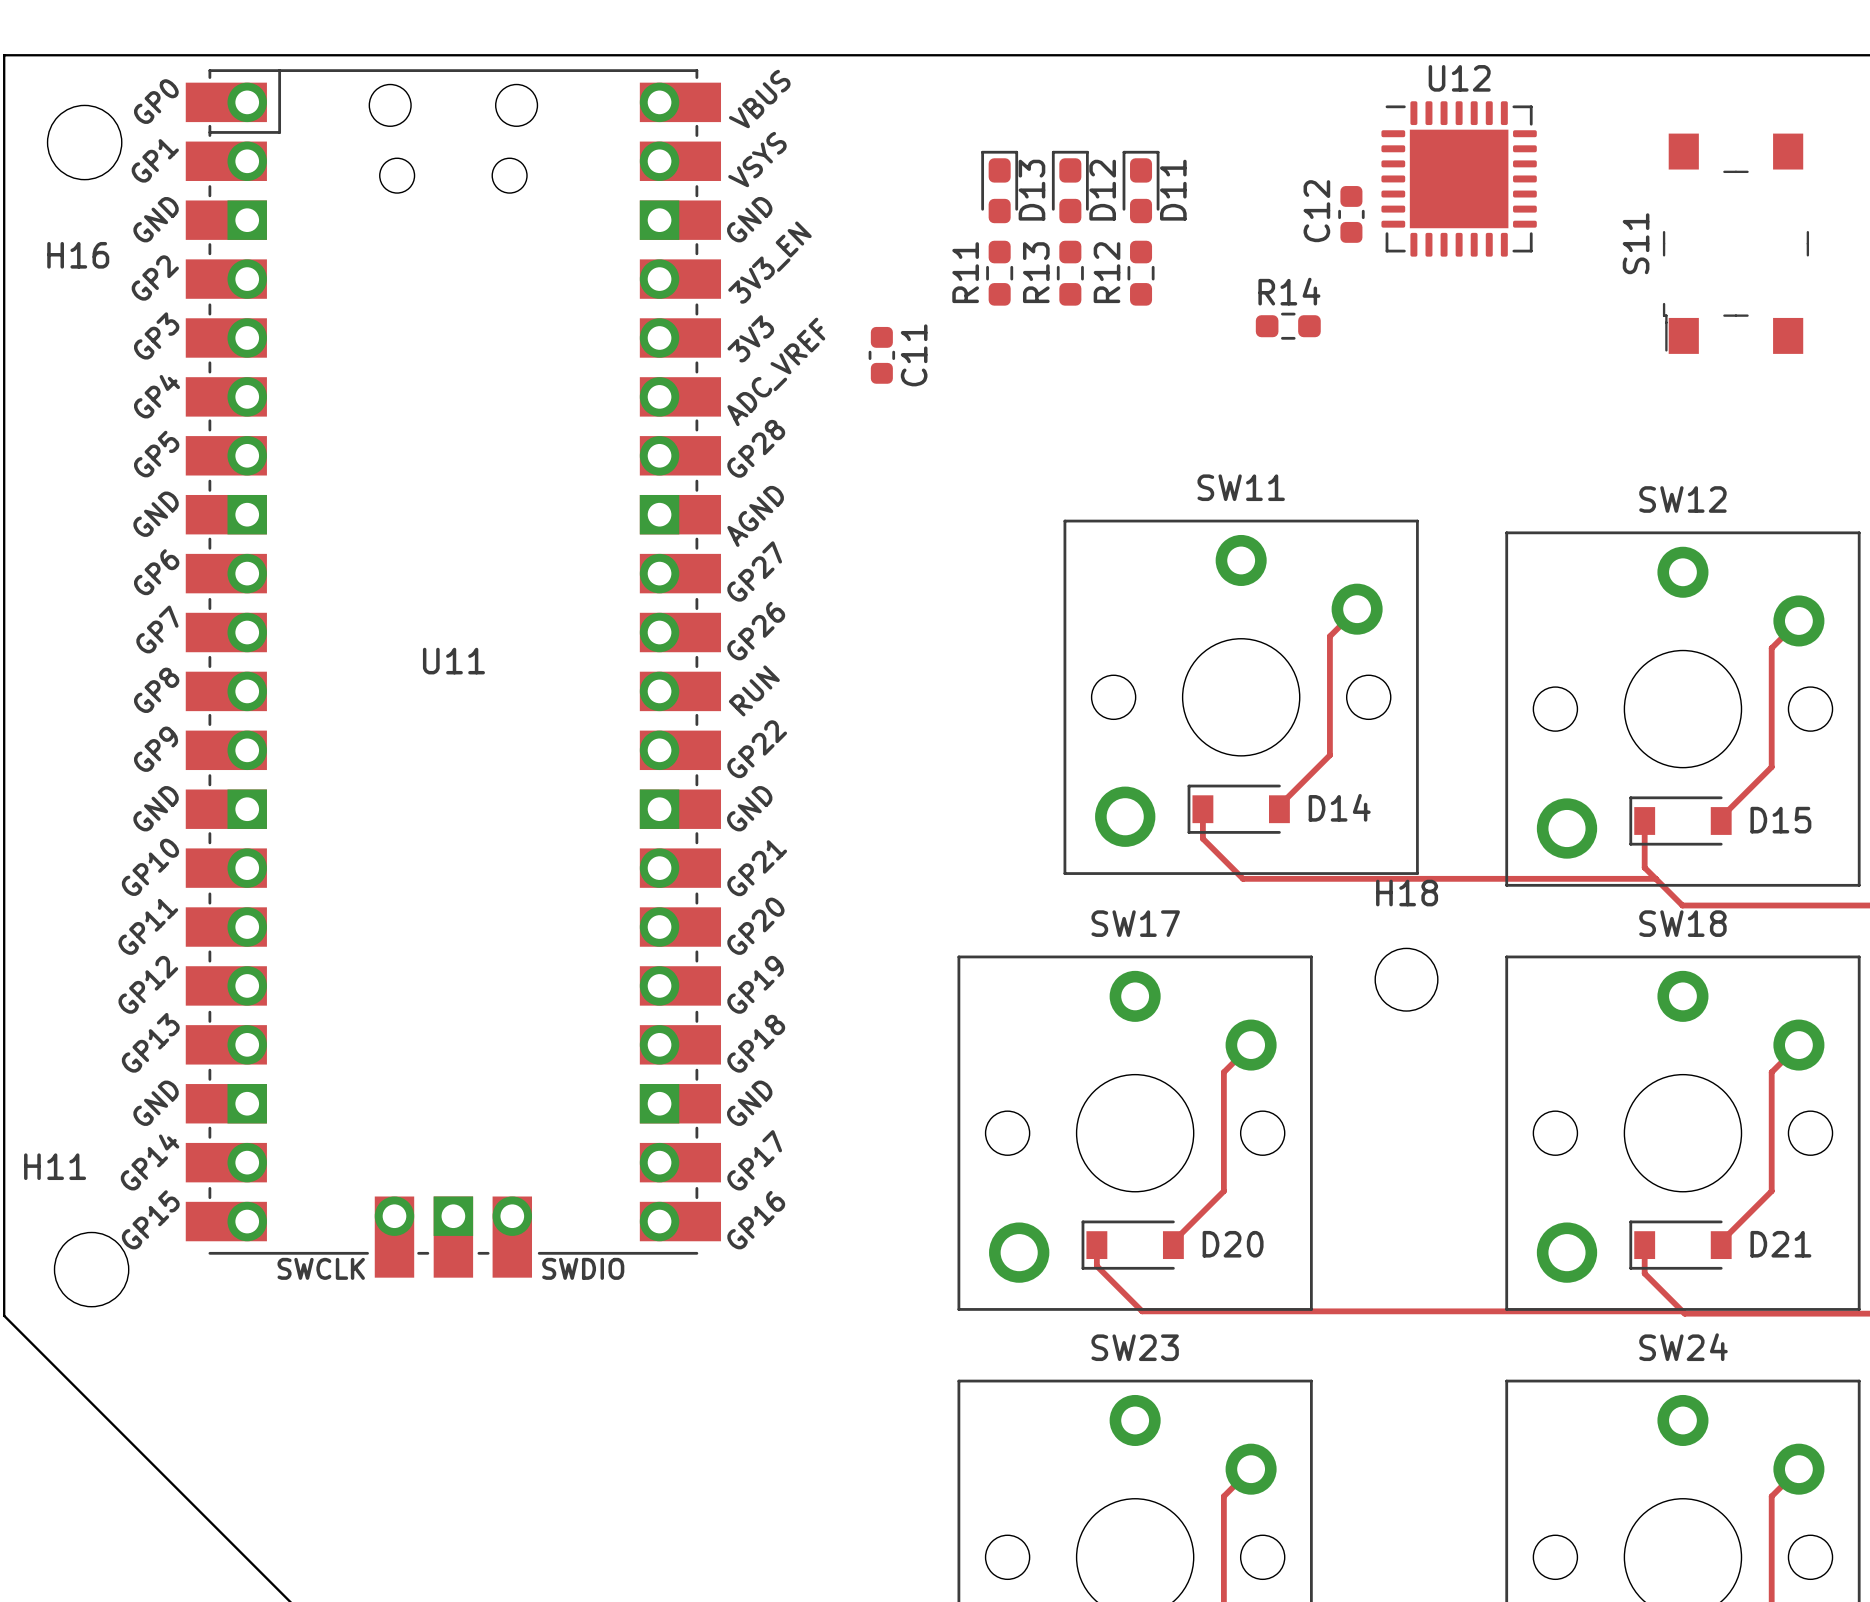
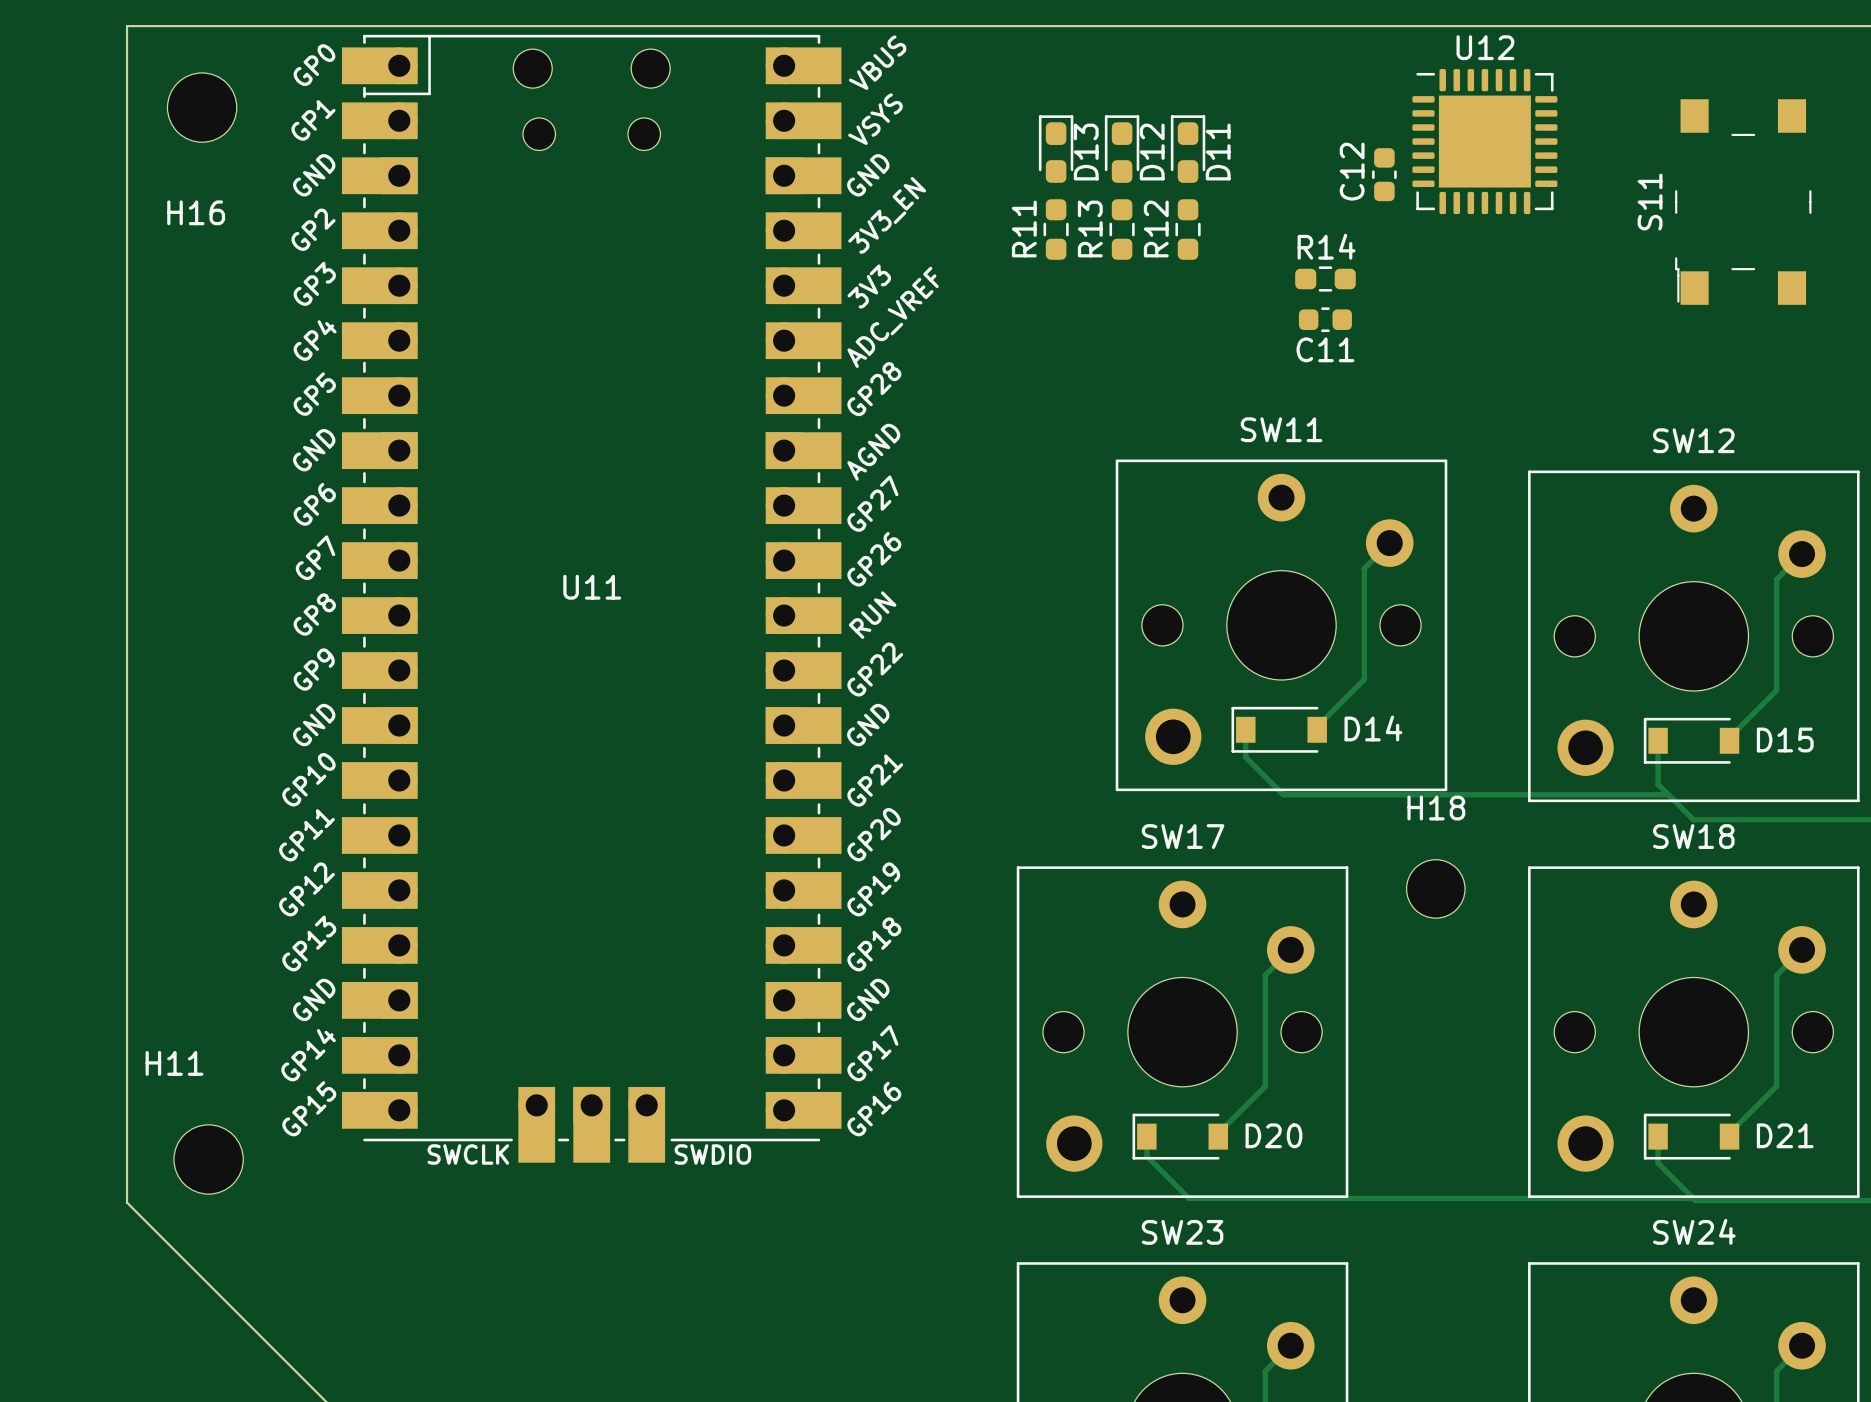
C11 rotation: 0° (881, 355) -> 90° clockwise (1325, 319)
C11 position: (881, 355) -> (1325, 319)
U11 position: (453, 673) -> (591, 598)

